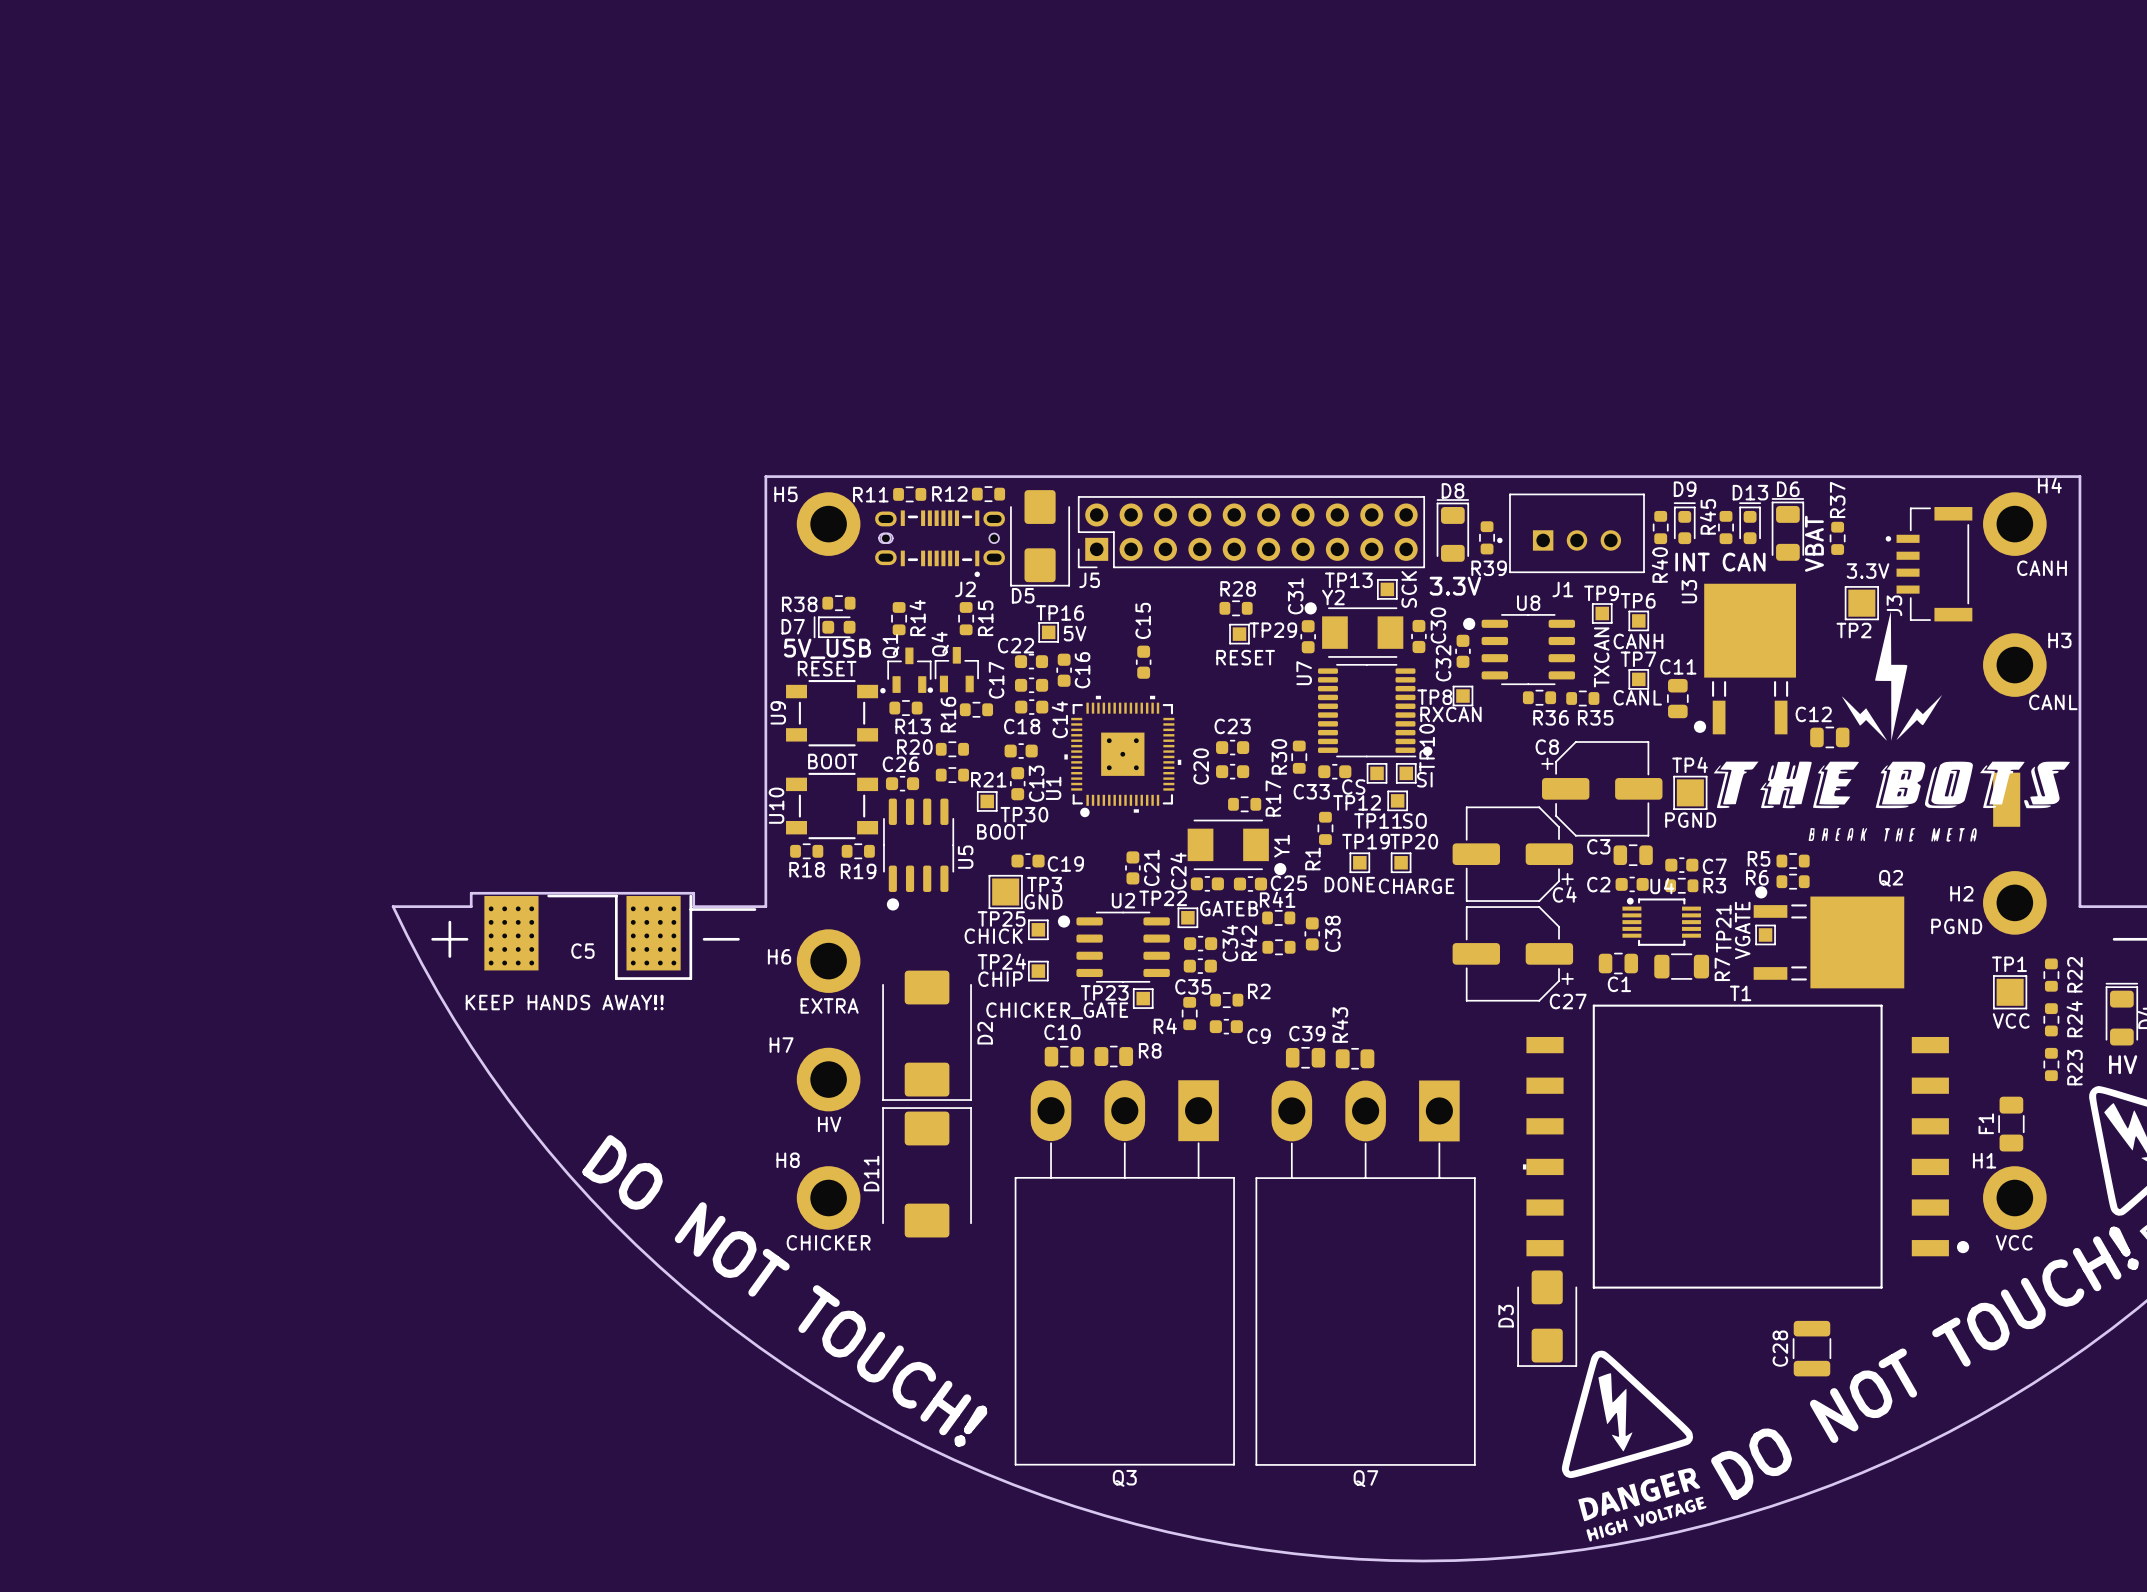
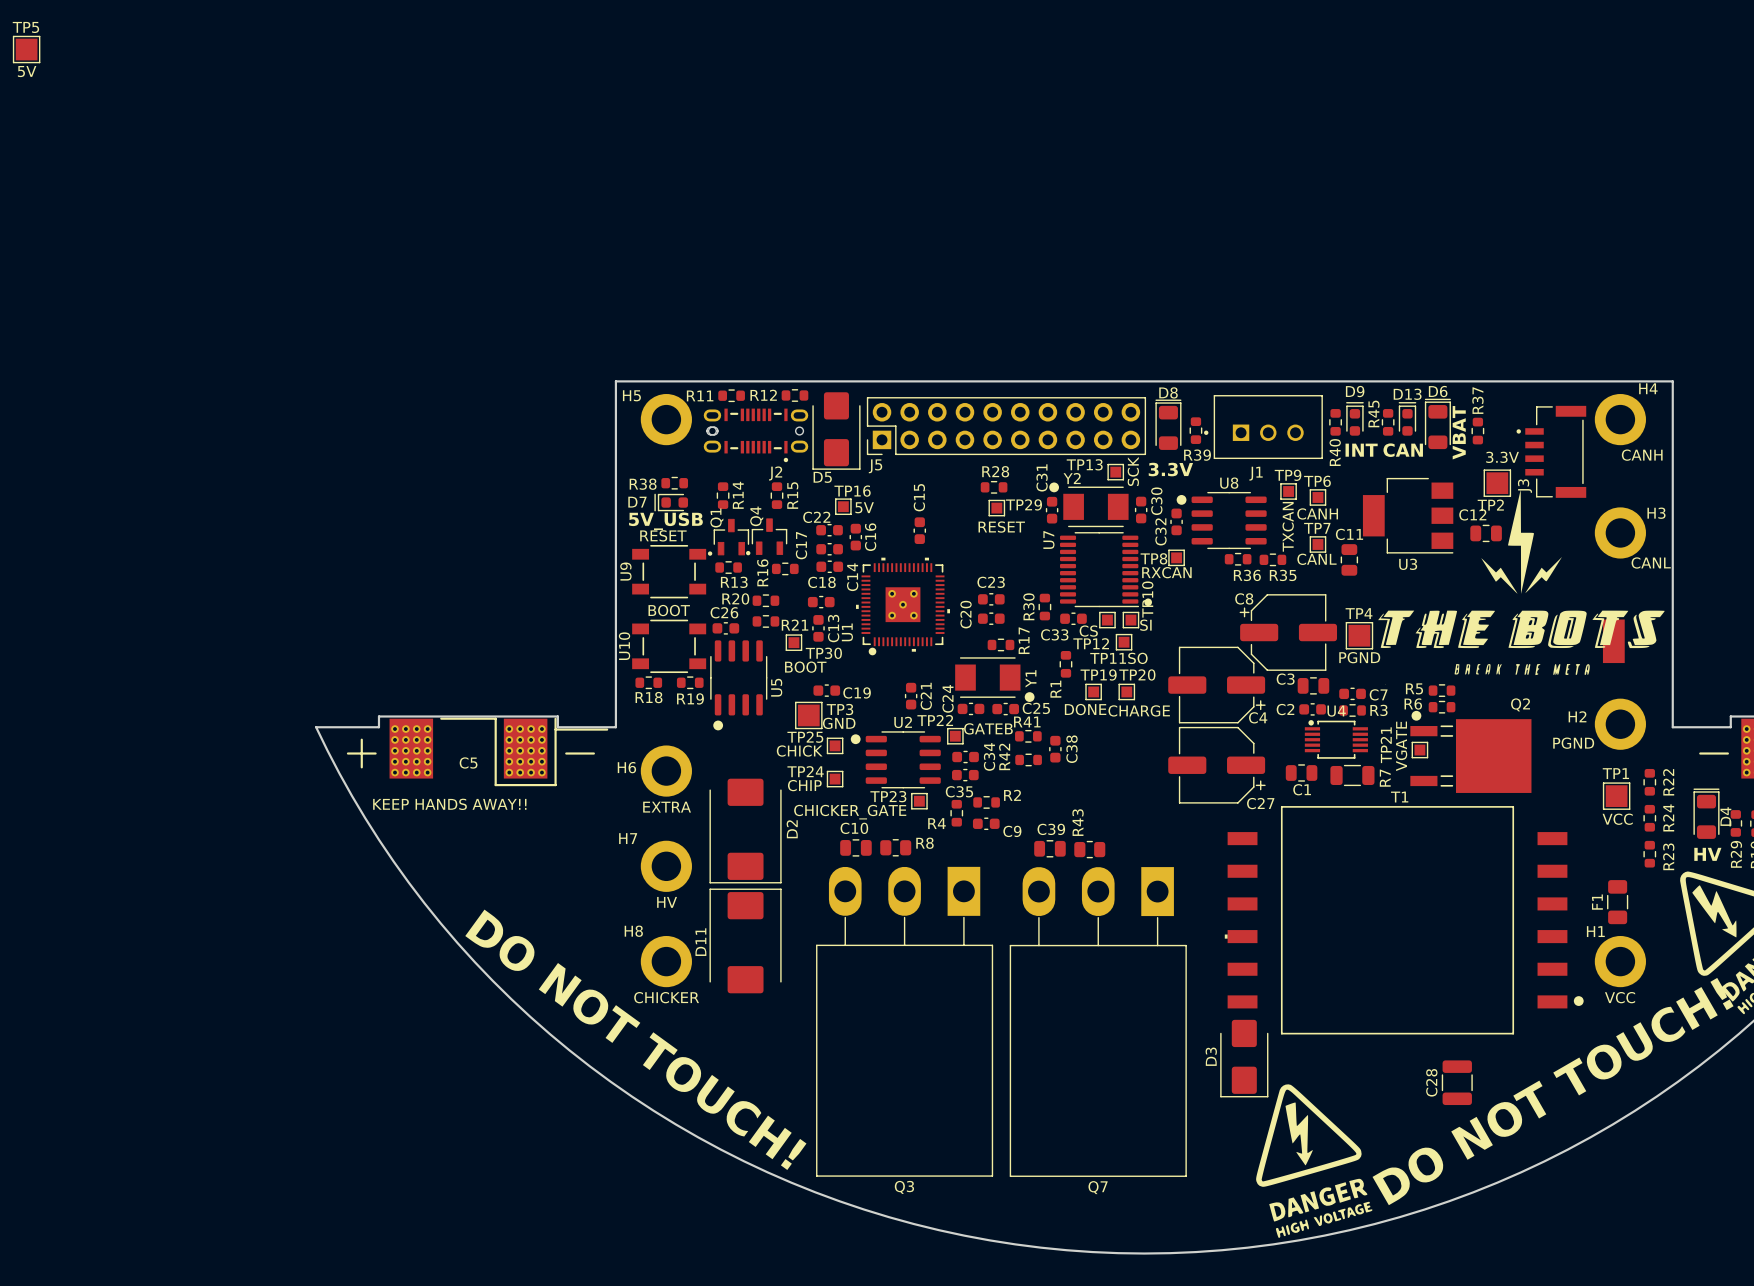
TP5: none -> 5V (26, 49)
U3 footprint: [1693, 583, 1796, 735] -> [1362, 477, 1454, 554]
U3 name position: U3 (1689, 591) -> U3 (1408, 564)
C12 position: (1829, 737) -> (1486, 533)

